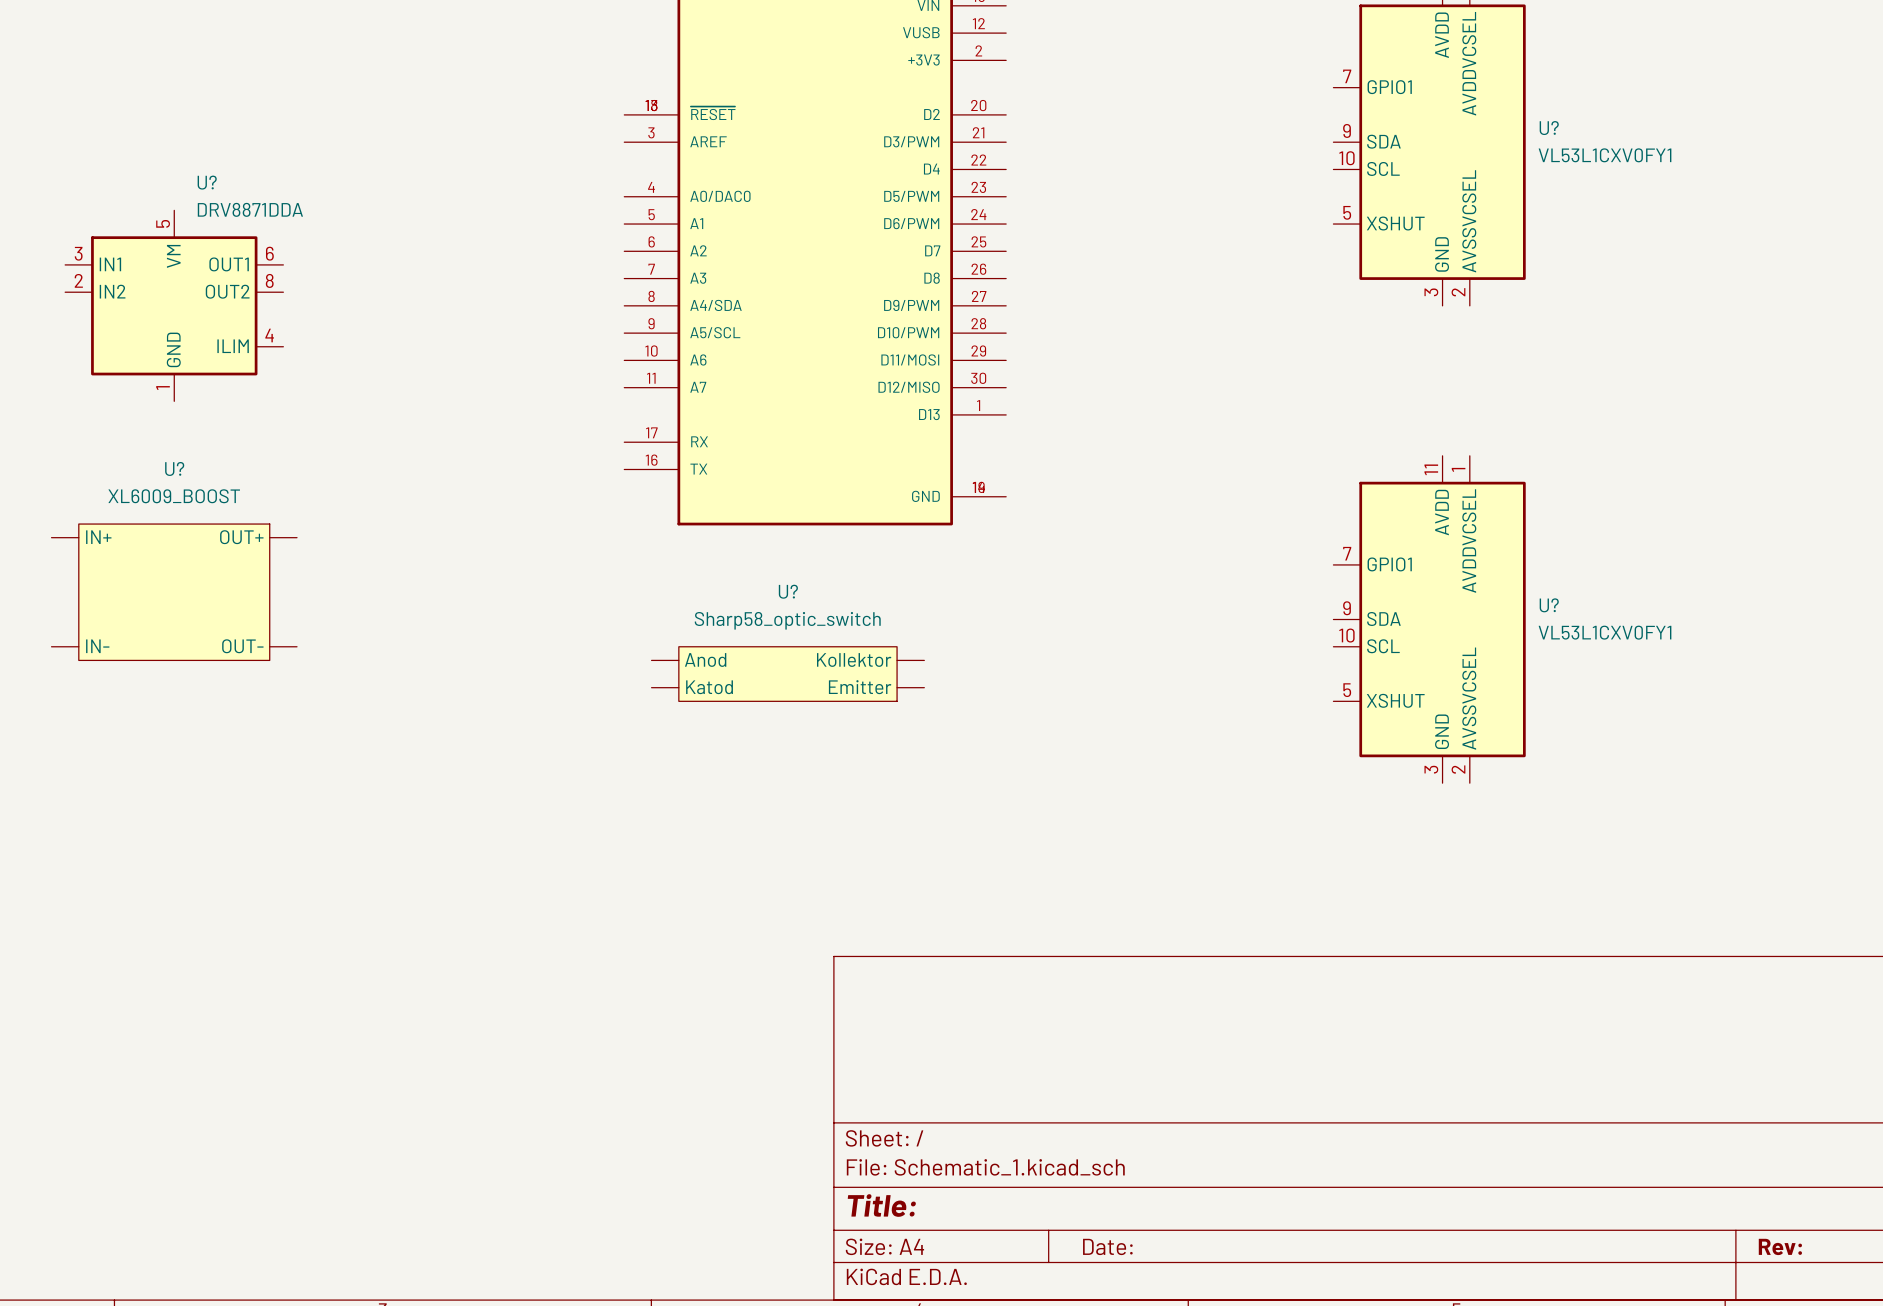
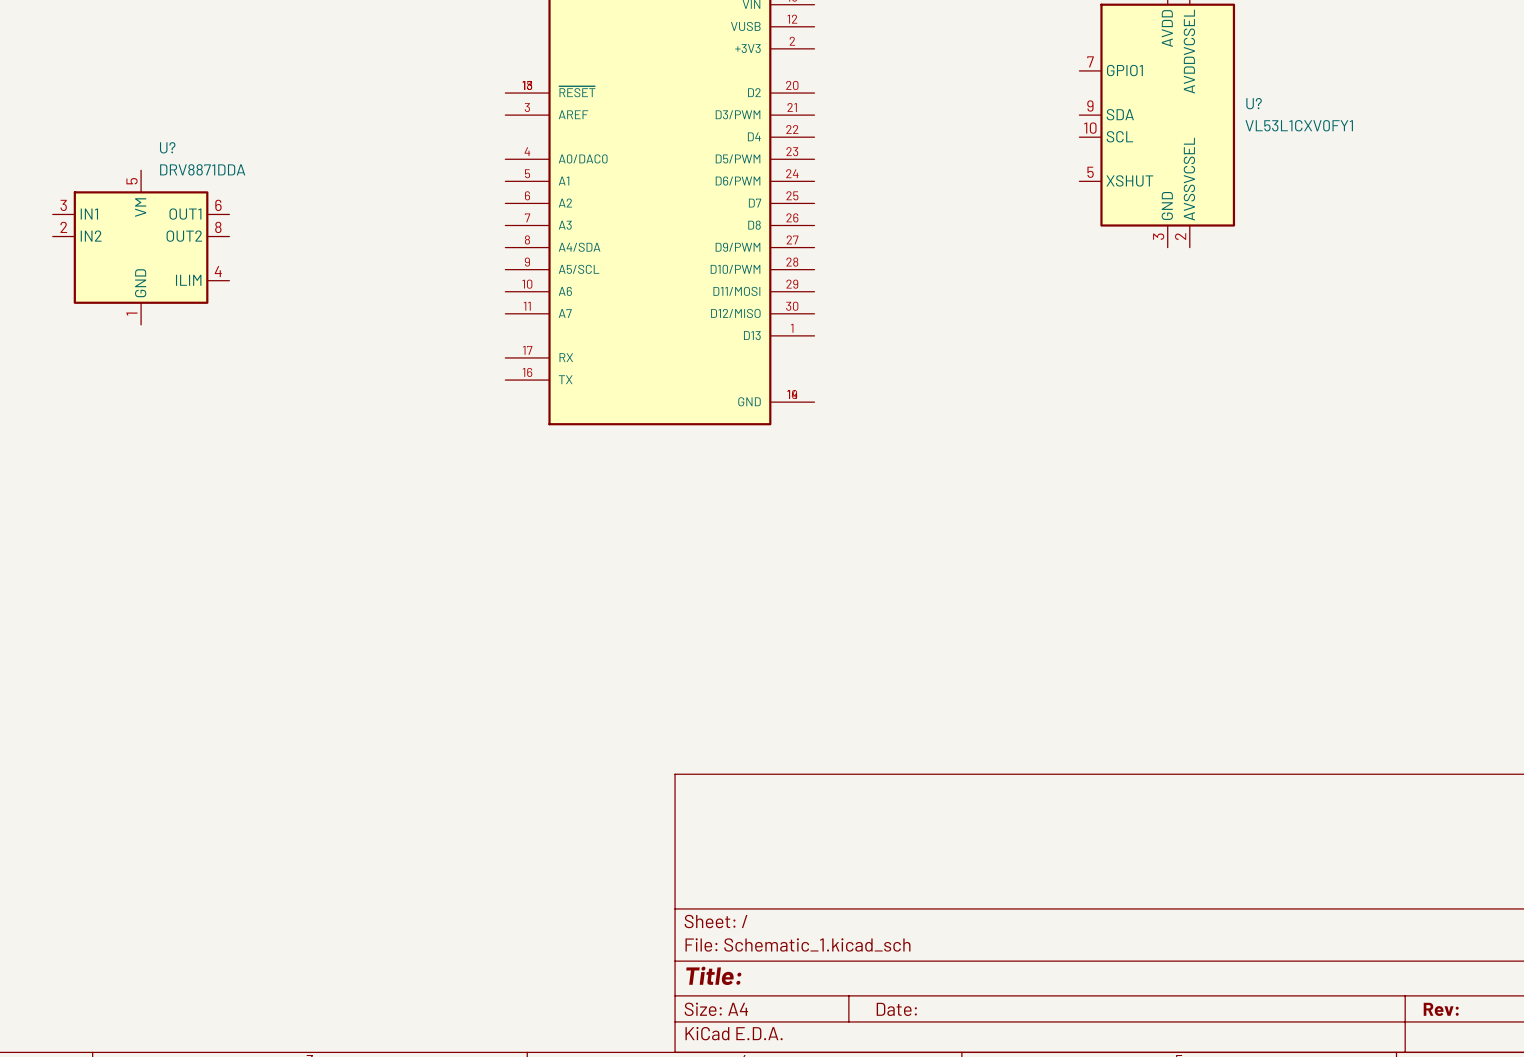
U?: XL6009_BOOST (174, 592) -> none
U?: VL53L1CXV0FY1 (1429, 619) -> none
U?: Sharp58_optic_switch (787, 674) -> none

